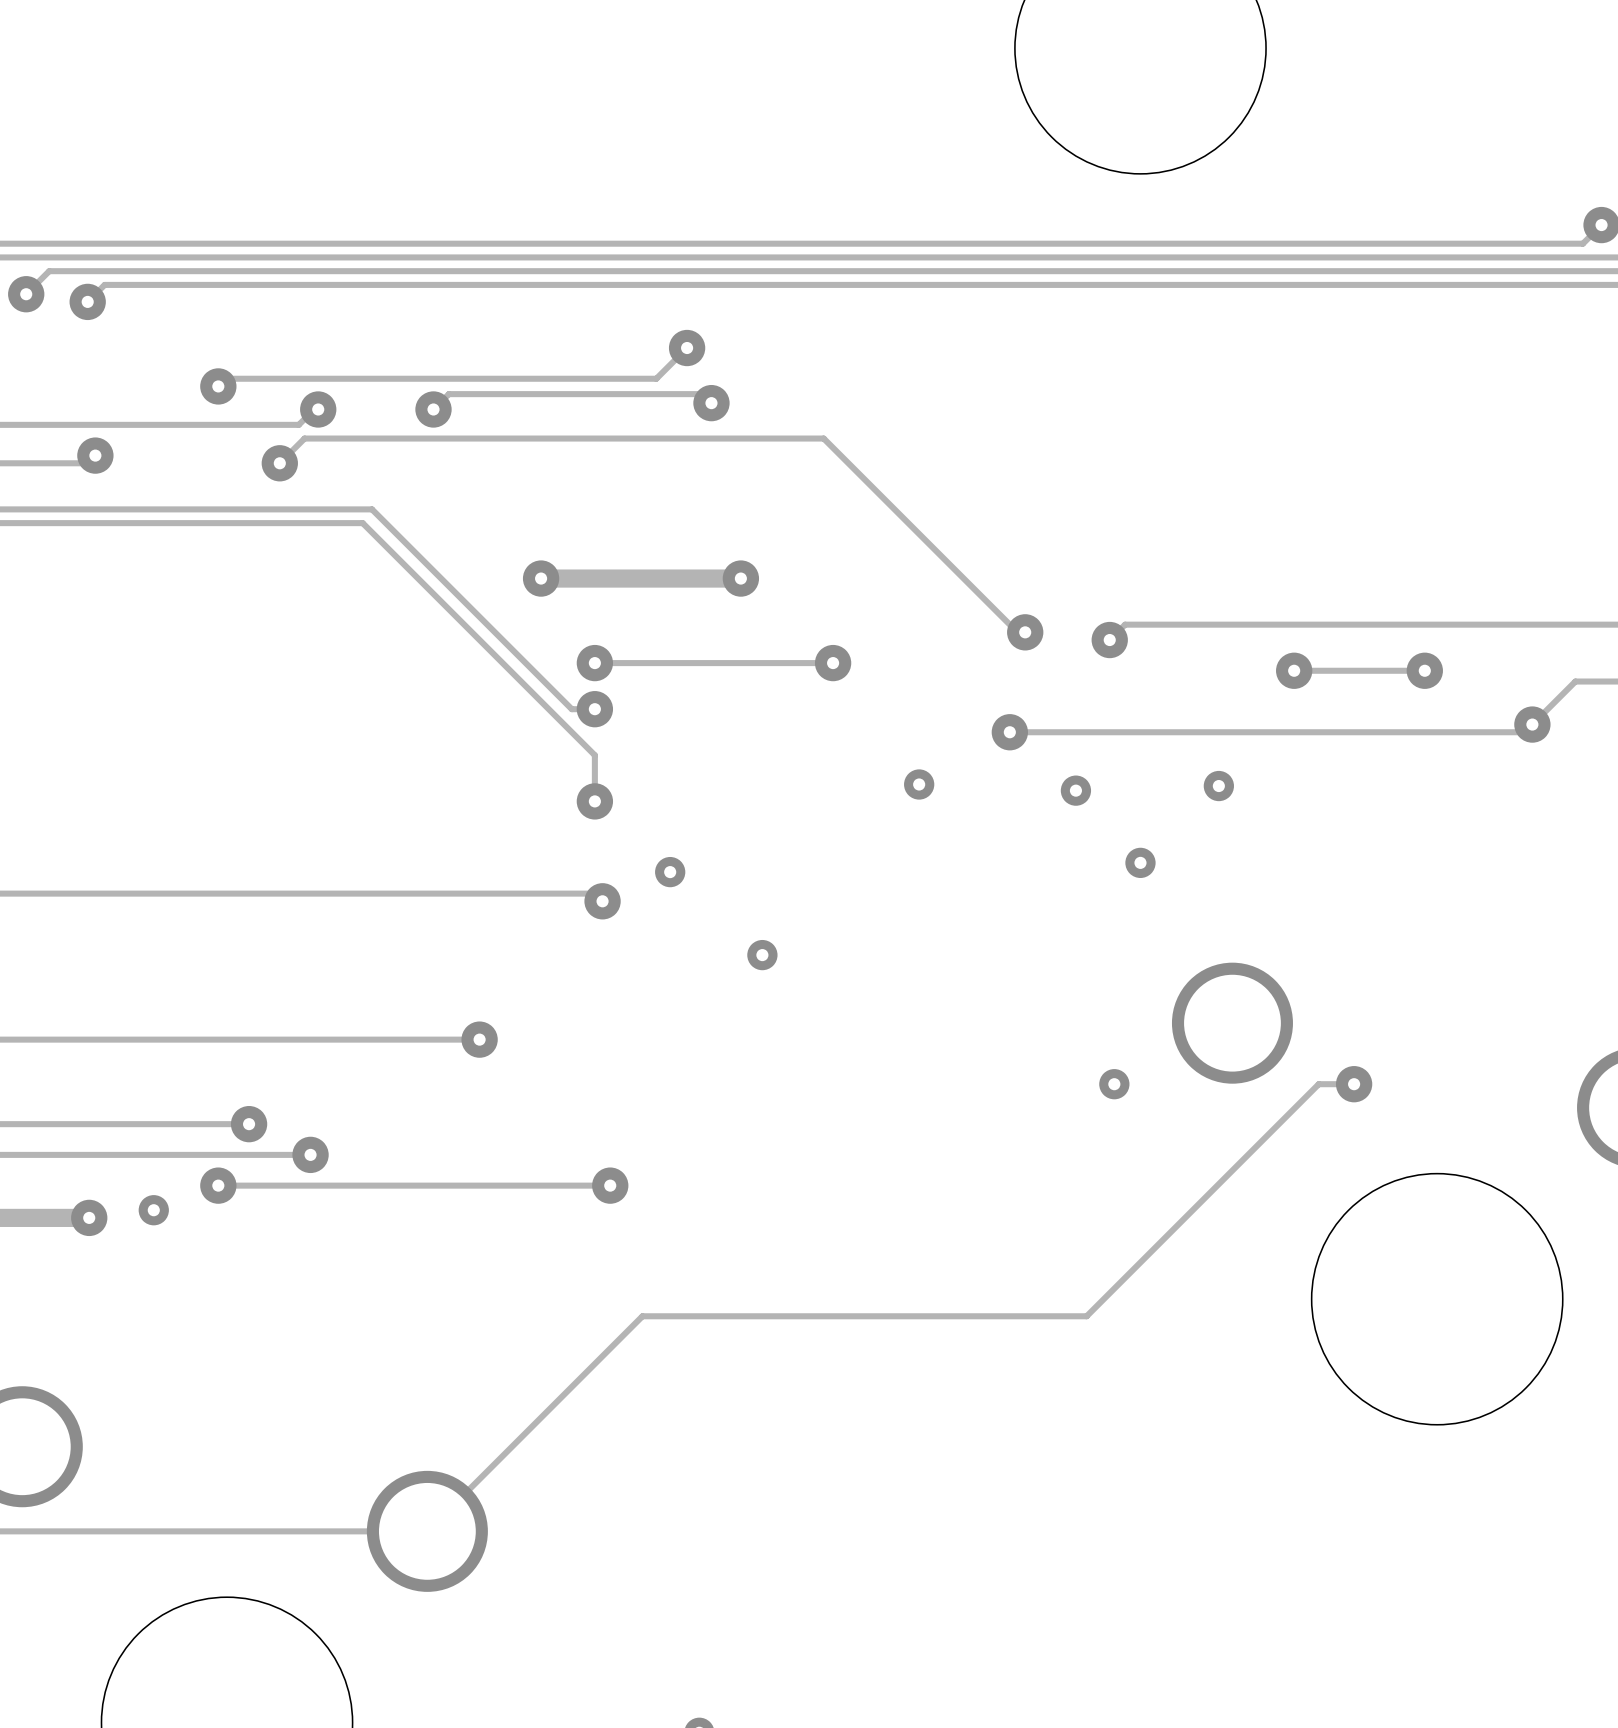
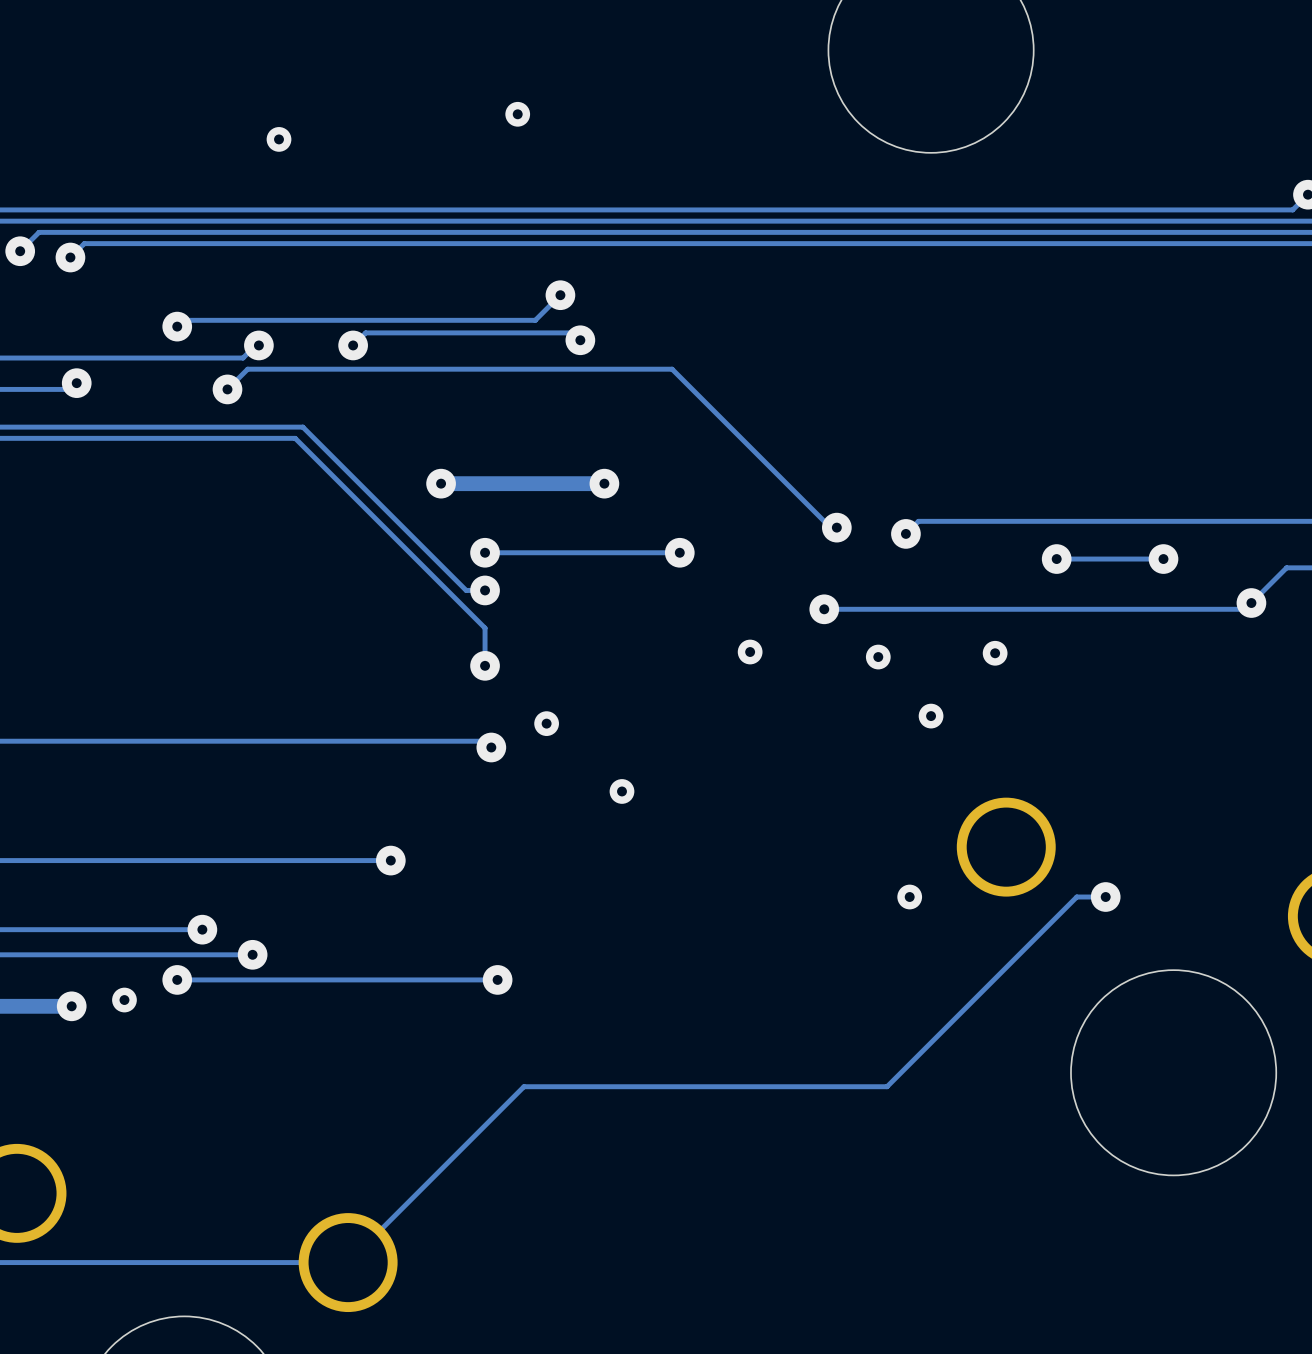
via: none -> (517, 114)
via: none -> (279, 139)

